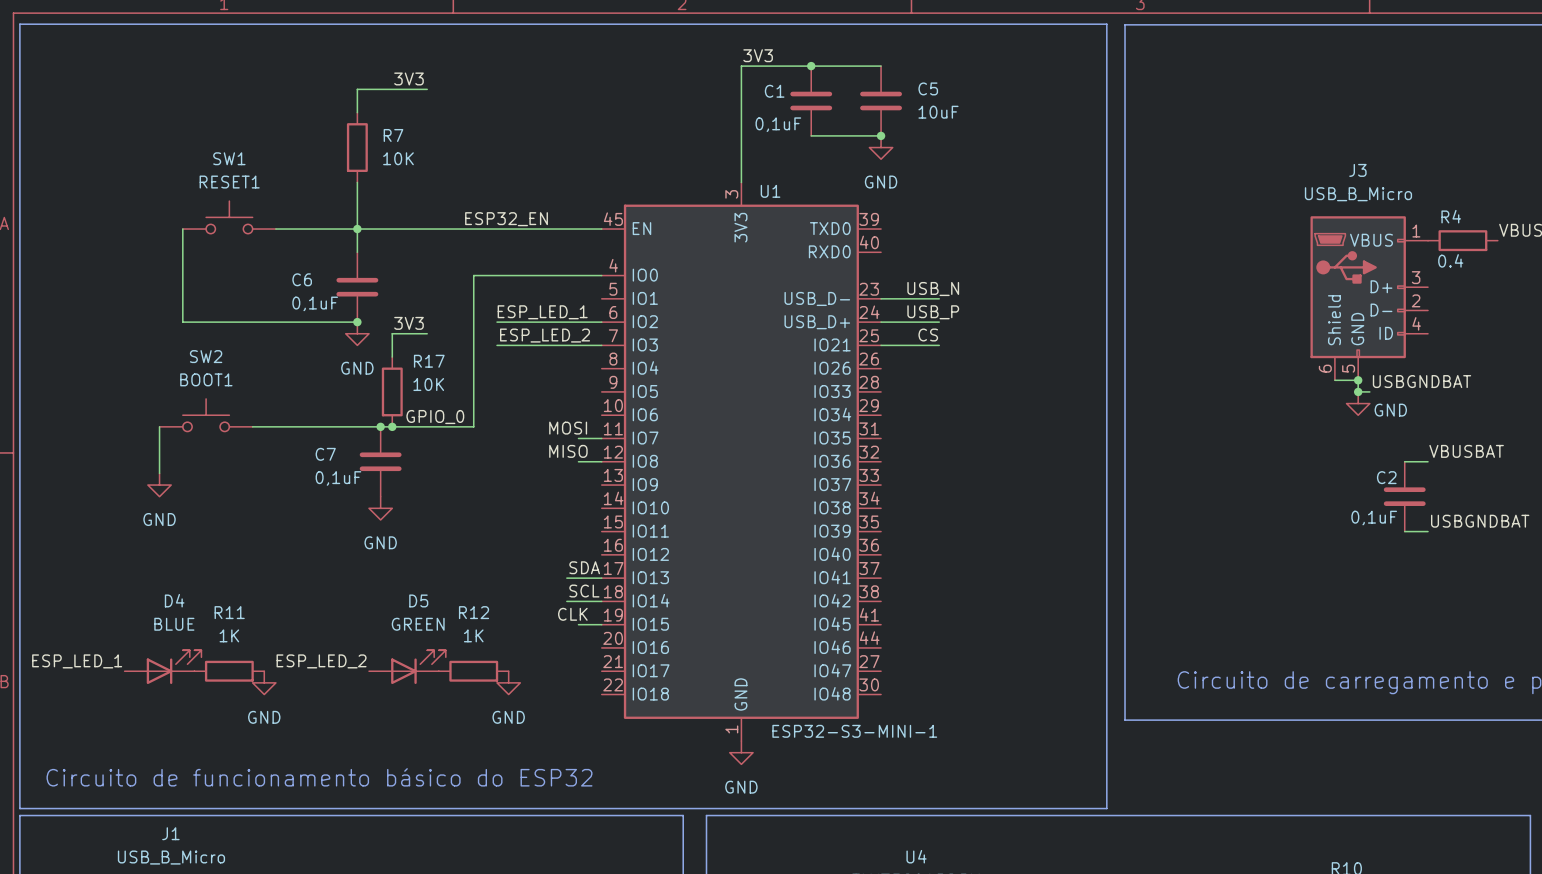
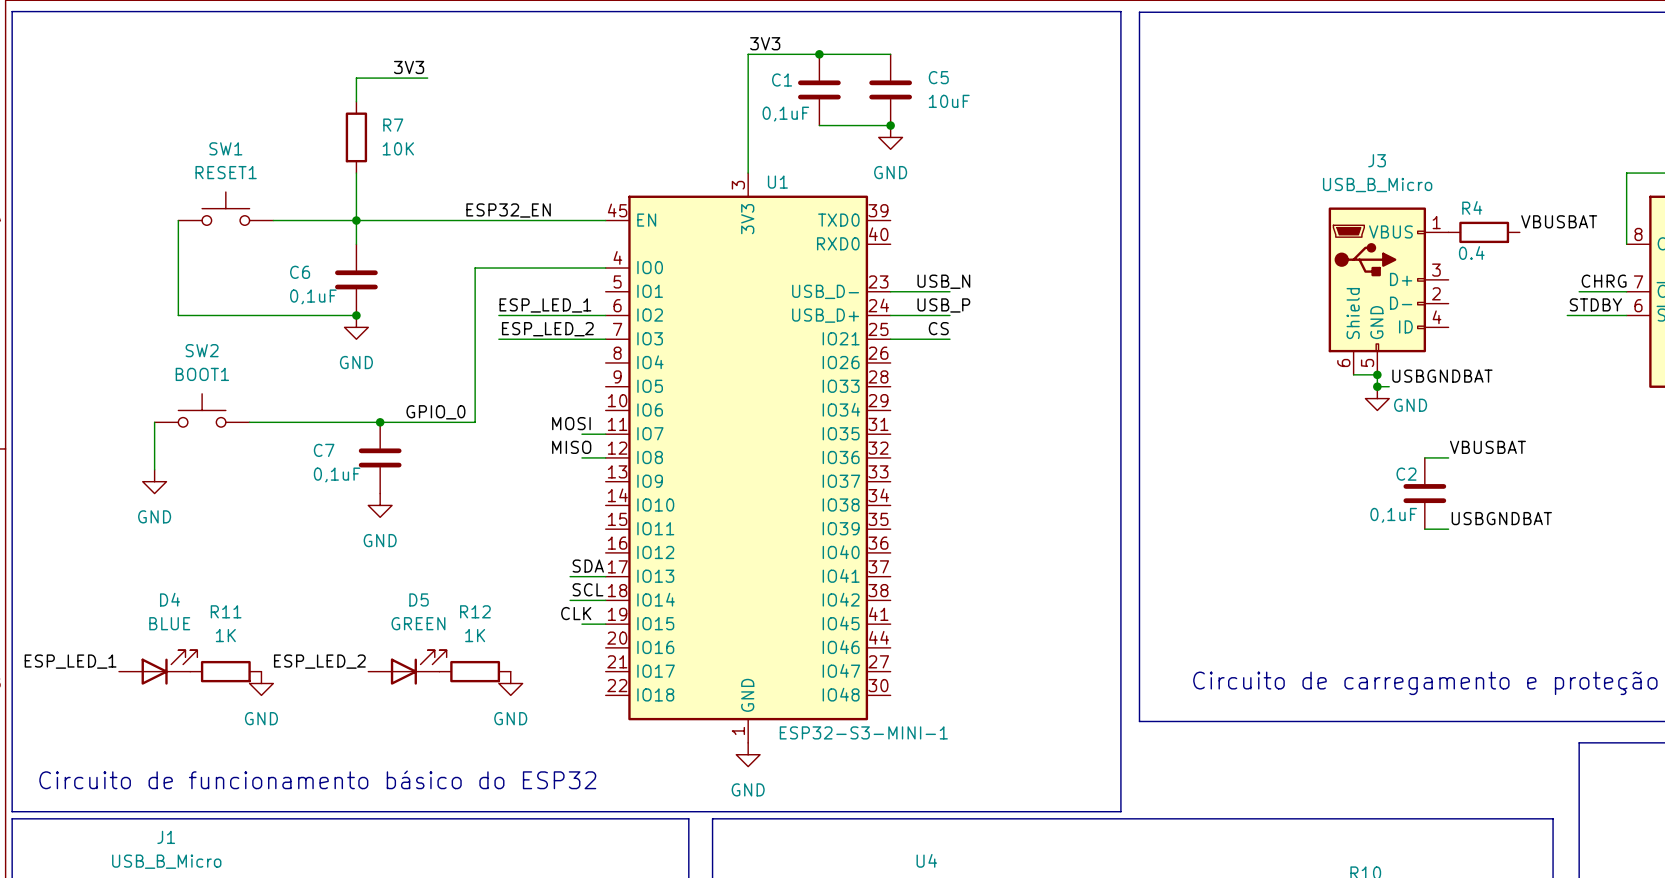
label: 3V3 (409, 323) -> none
wire: (427, 333) (392, 333) (392, 357) -> none
R17: 10K (392, 391) -> none
junction: (392, 426) -> none

